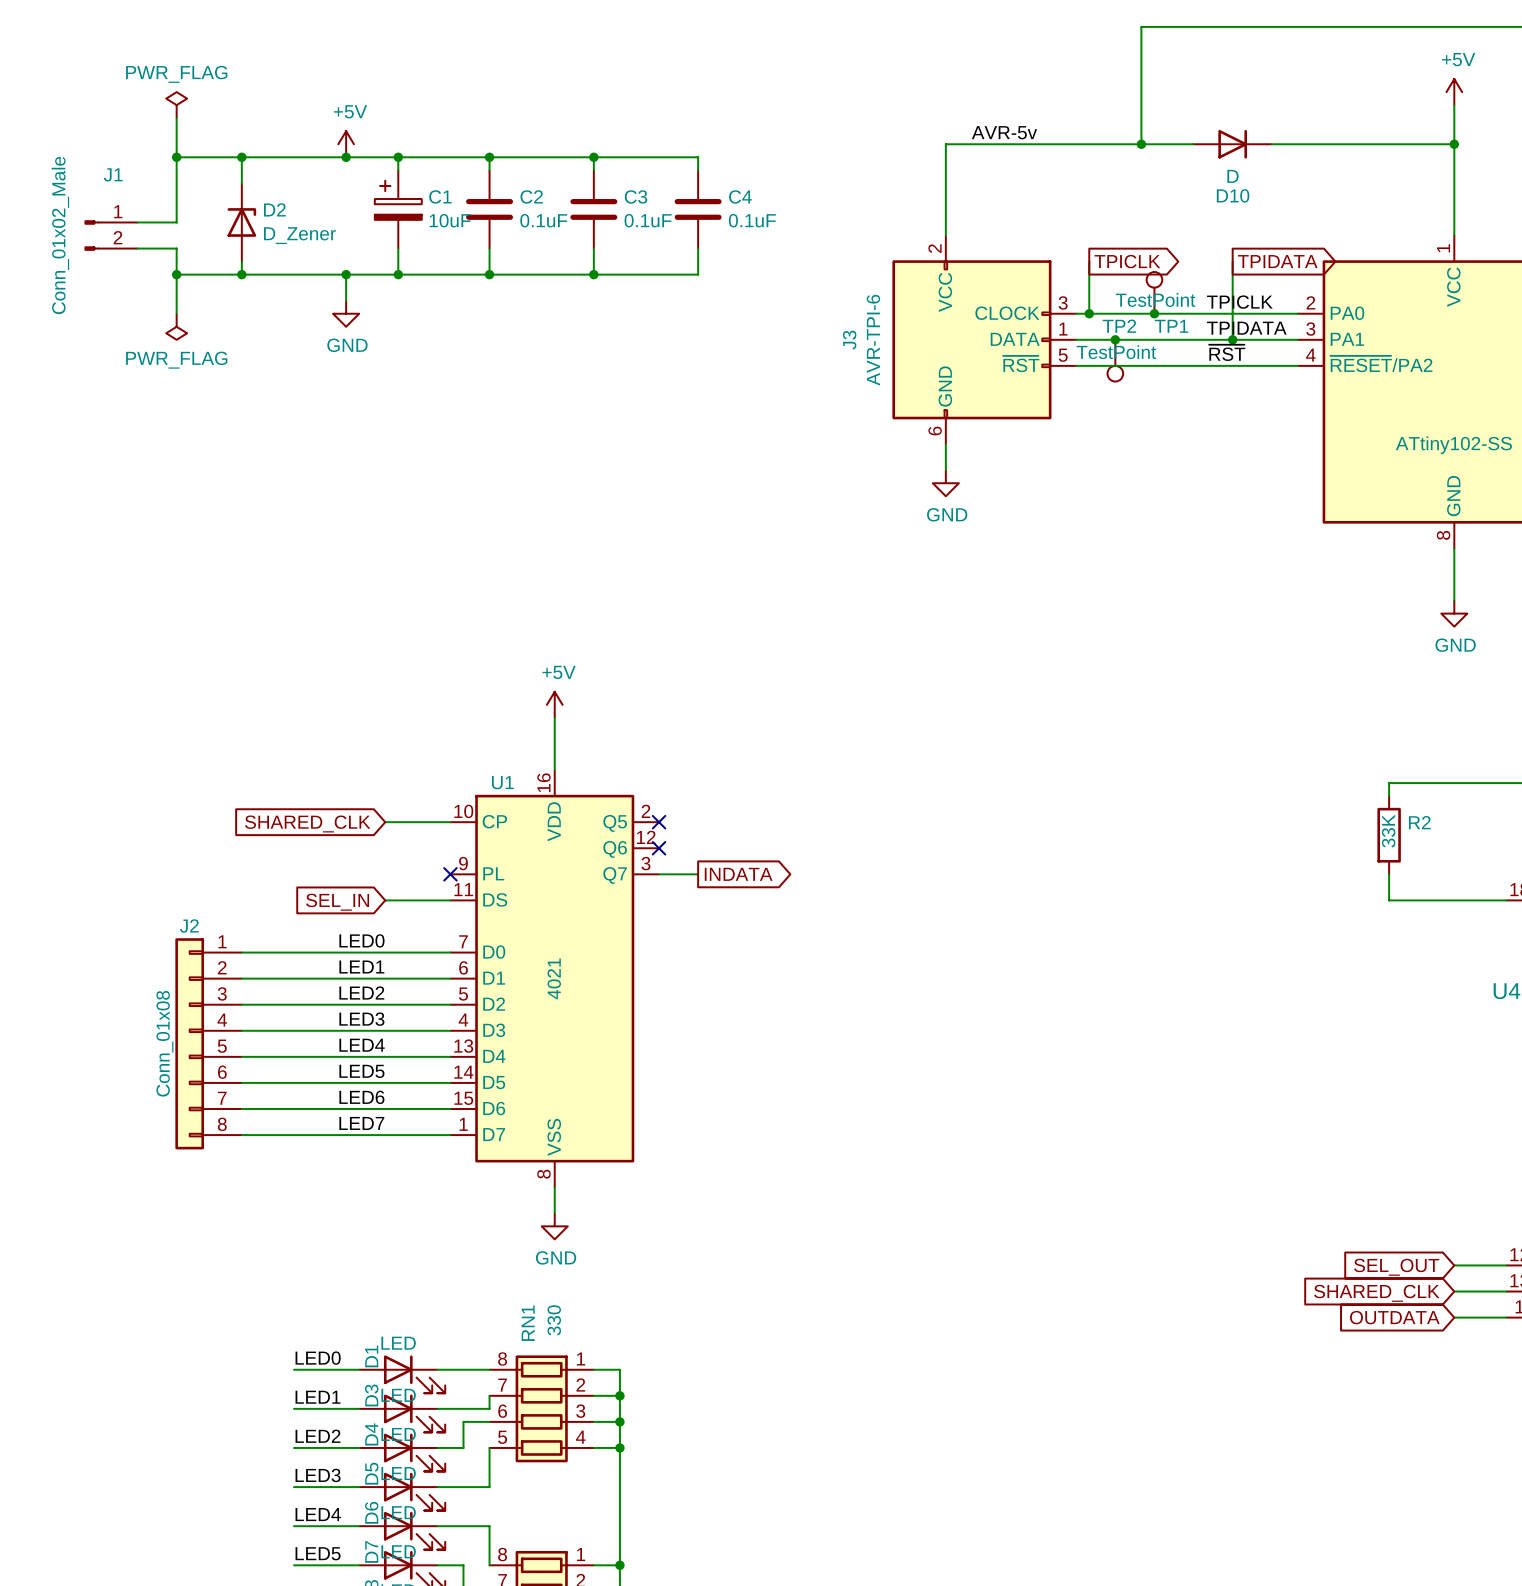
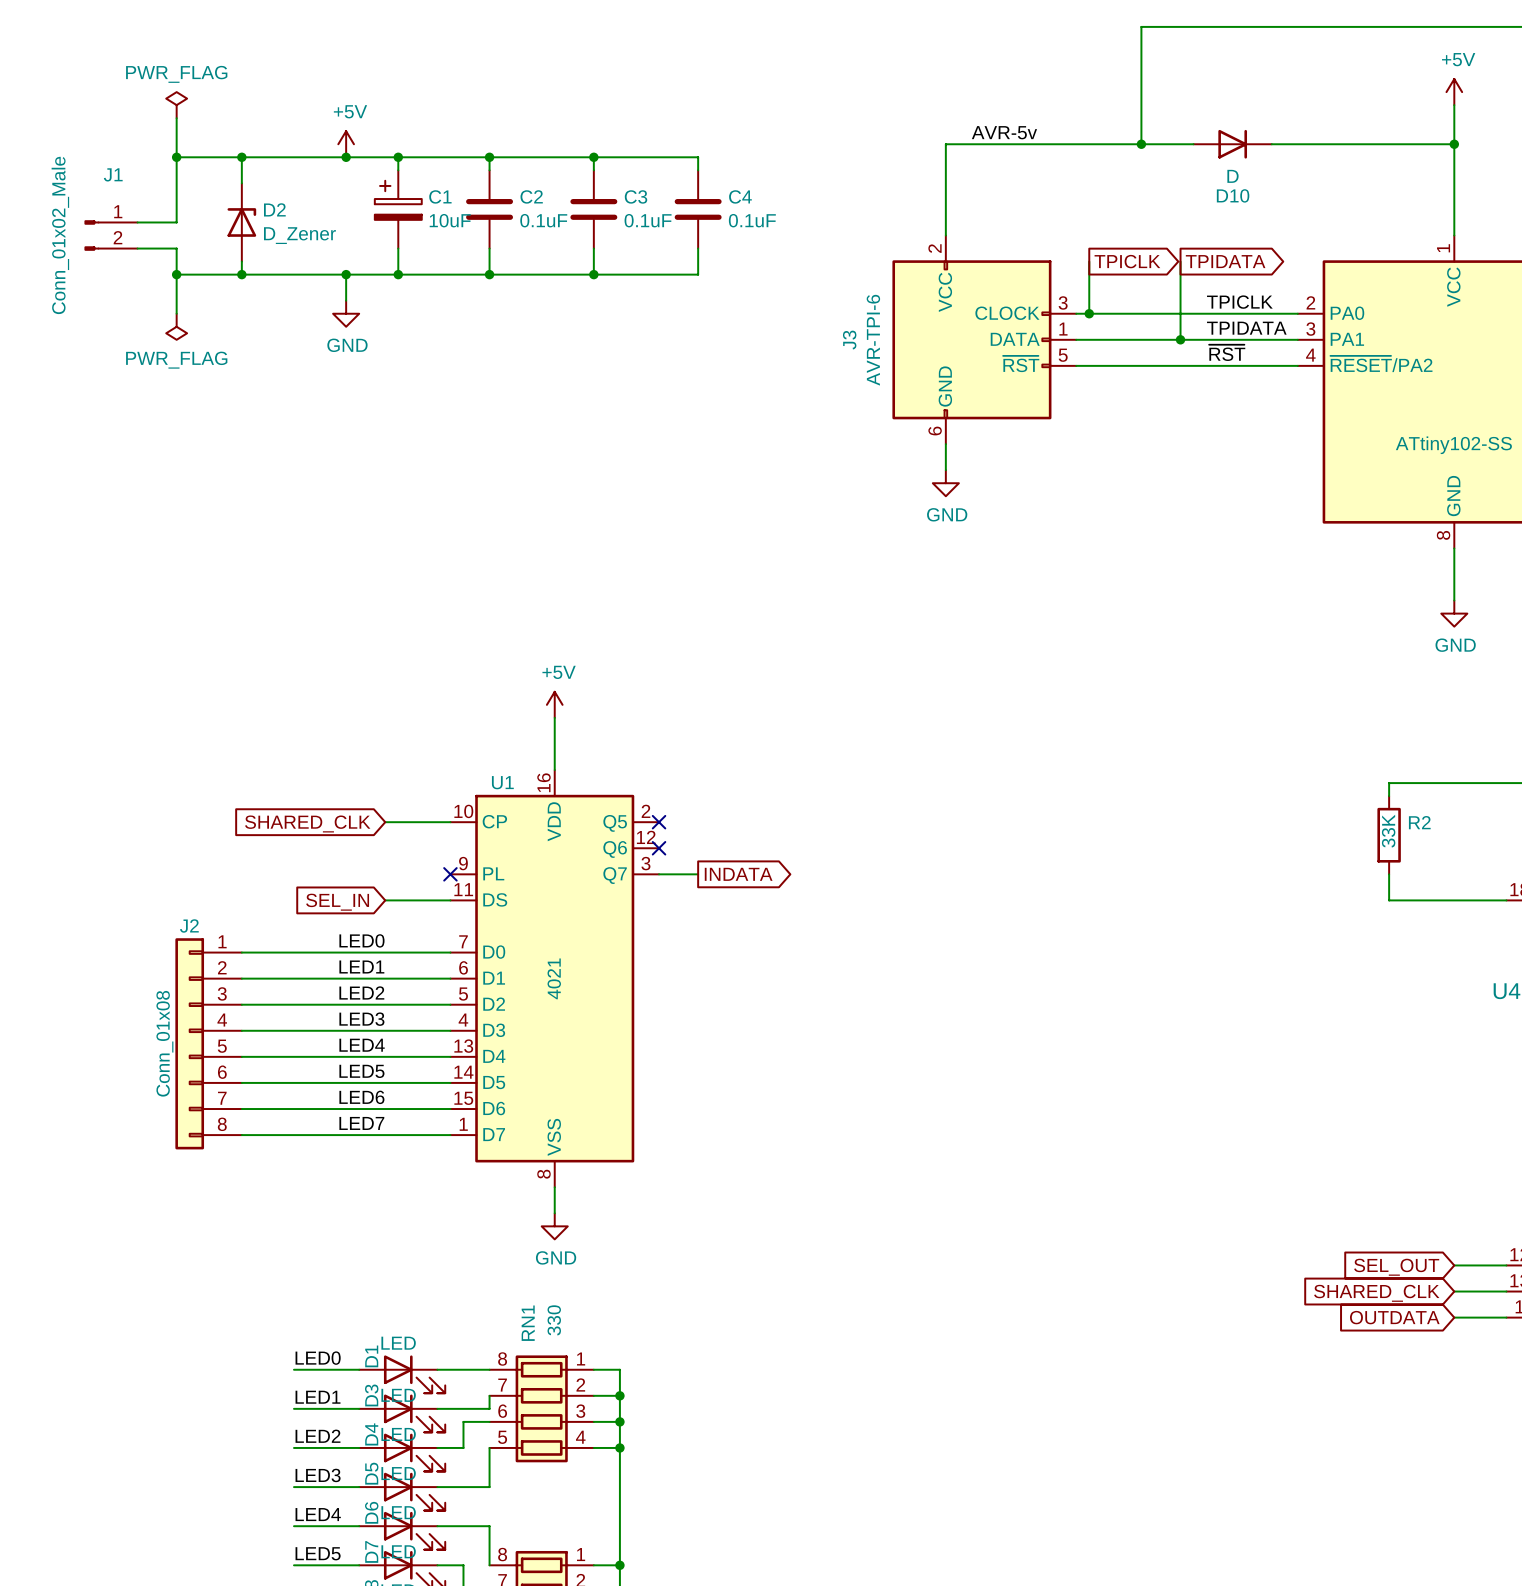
wire: (1232, 261) (1232, 339) -> (1180, 261) (1180, 339)
global label position: TPIDATA (1277, 261) -> TPIDATA (1225, 261)
TP1: TestPoint (1154, 292) -> none
junction: (1154, 313) -> none
junction: (1115, 339) -> none
junction: none -> (1180, 339)
junction: (1232, 339) -> none
TP2: TestPoint (1115, 360) -> none

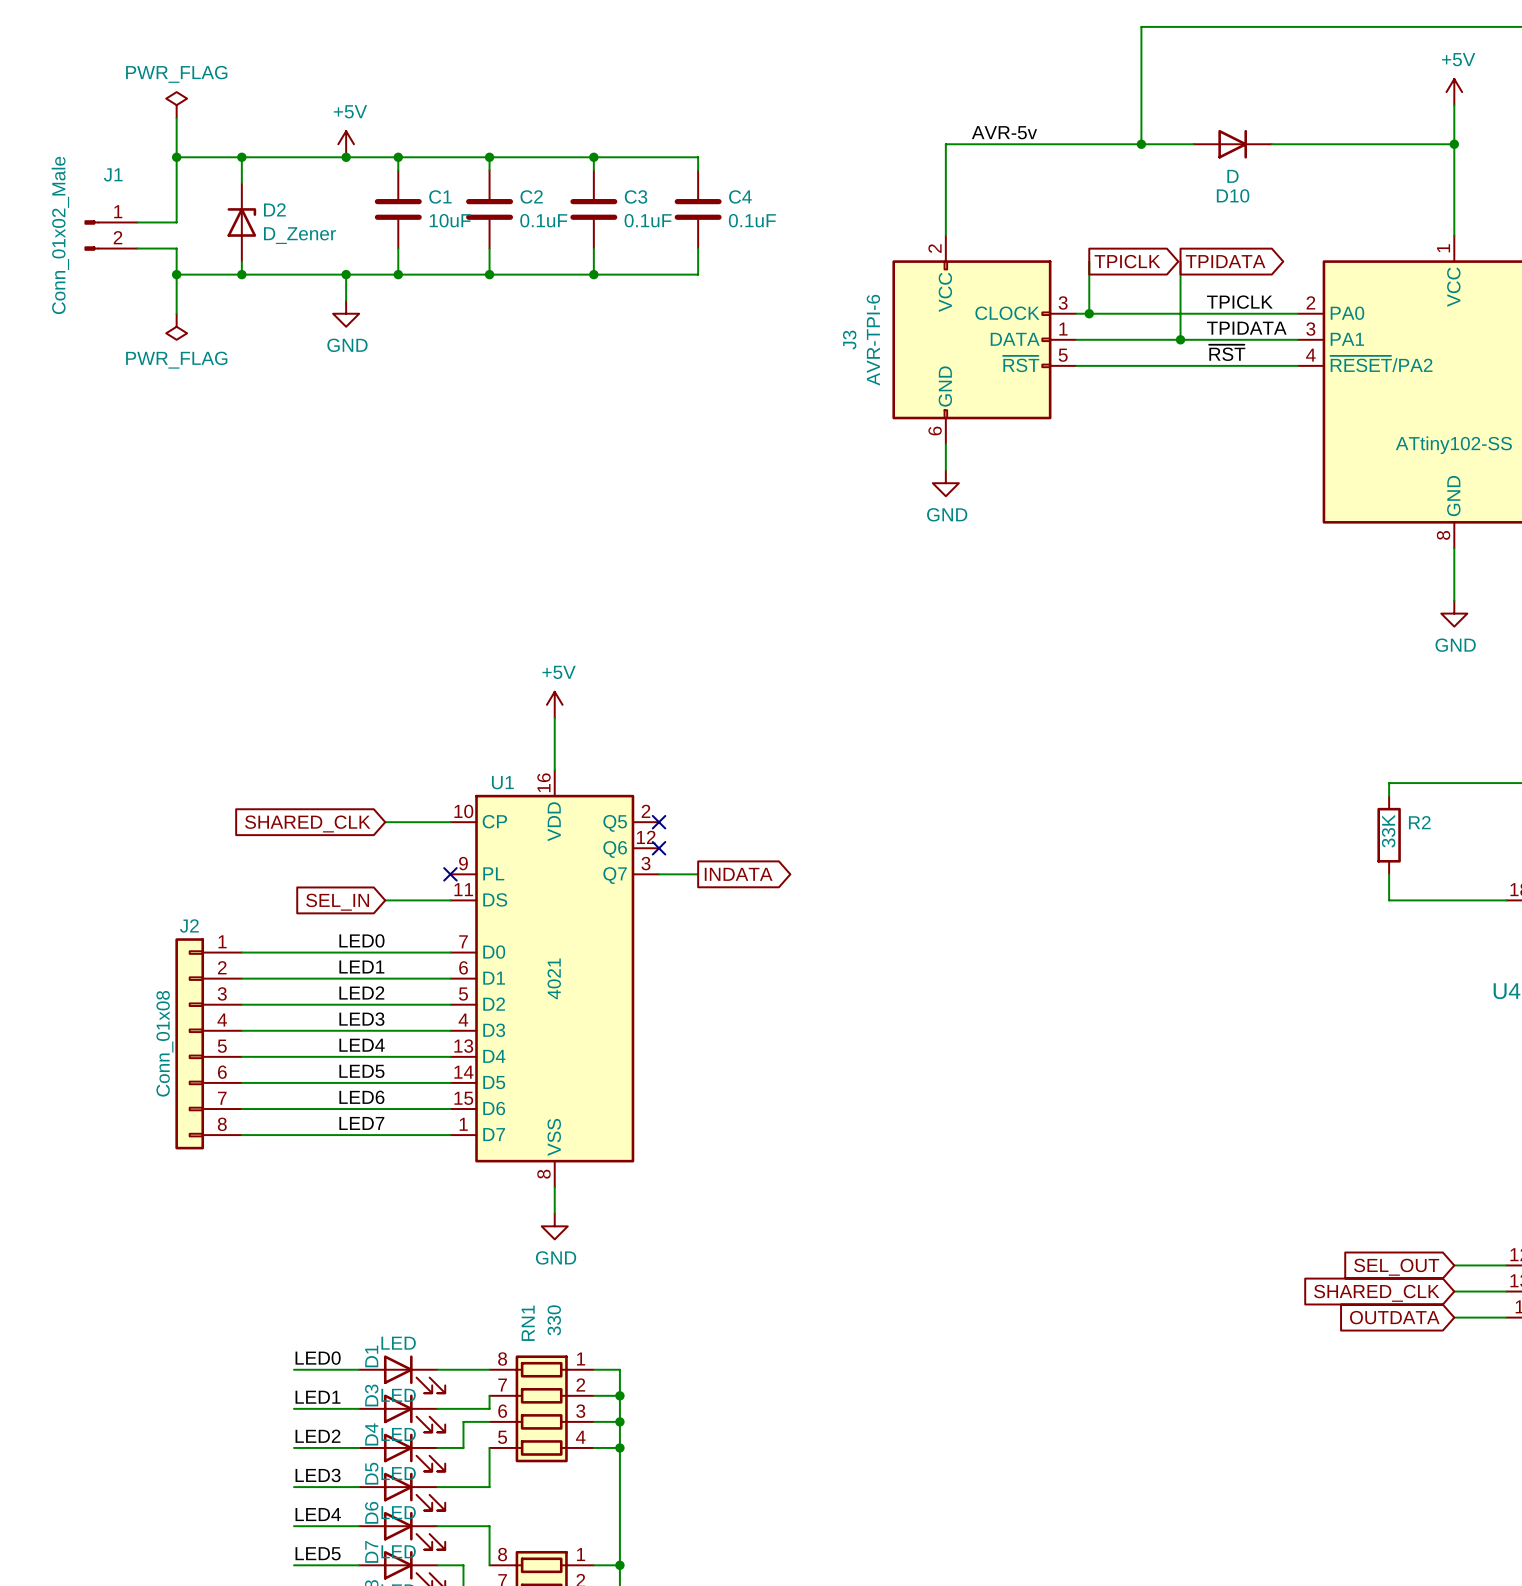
C1 symbol: [374, 170, 422, 249] -> [374, 170, 422, 249]

